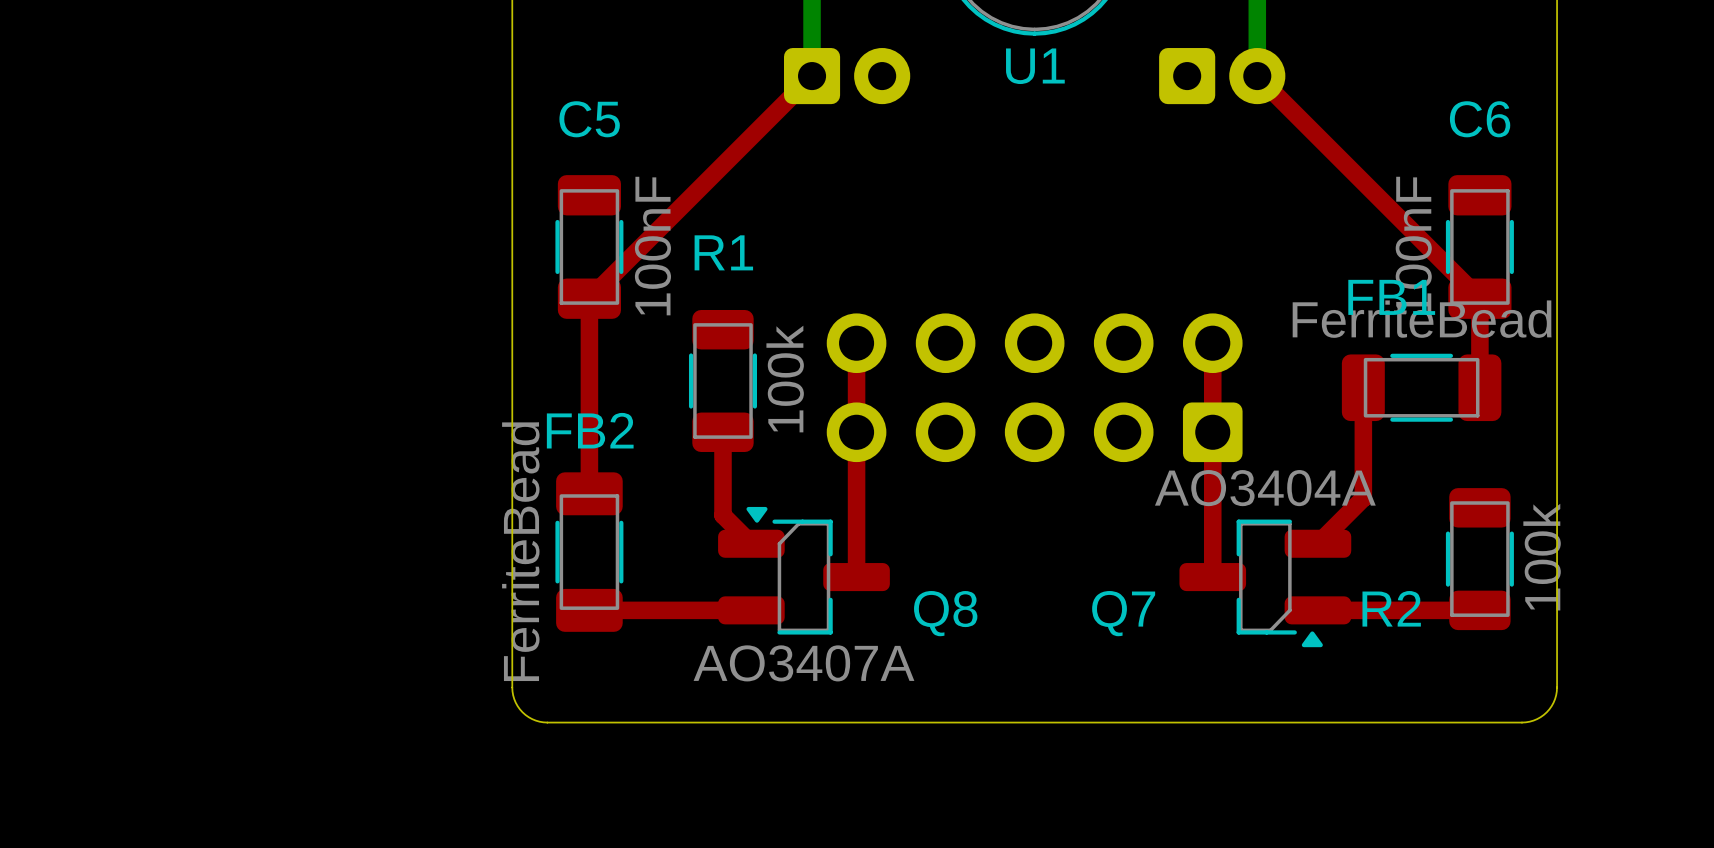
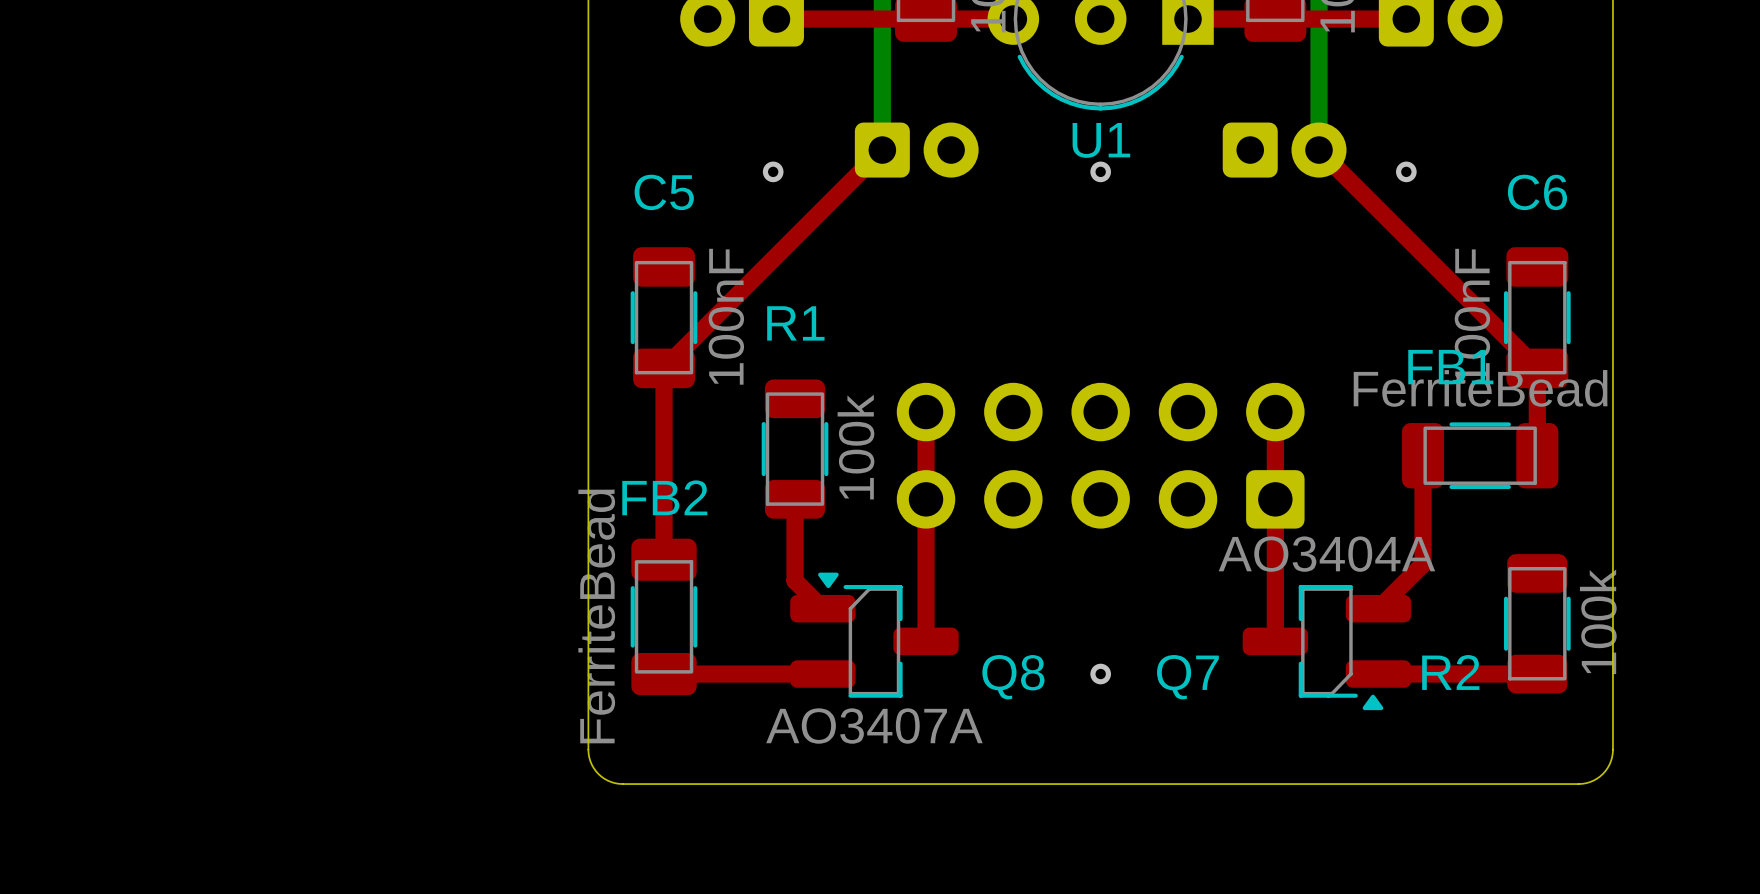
via: none -> (773, 171)
via: none -> (1100, 171)
via: none -> (1406, 171)
via: none -> (1100, 674)

